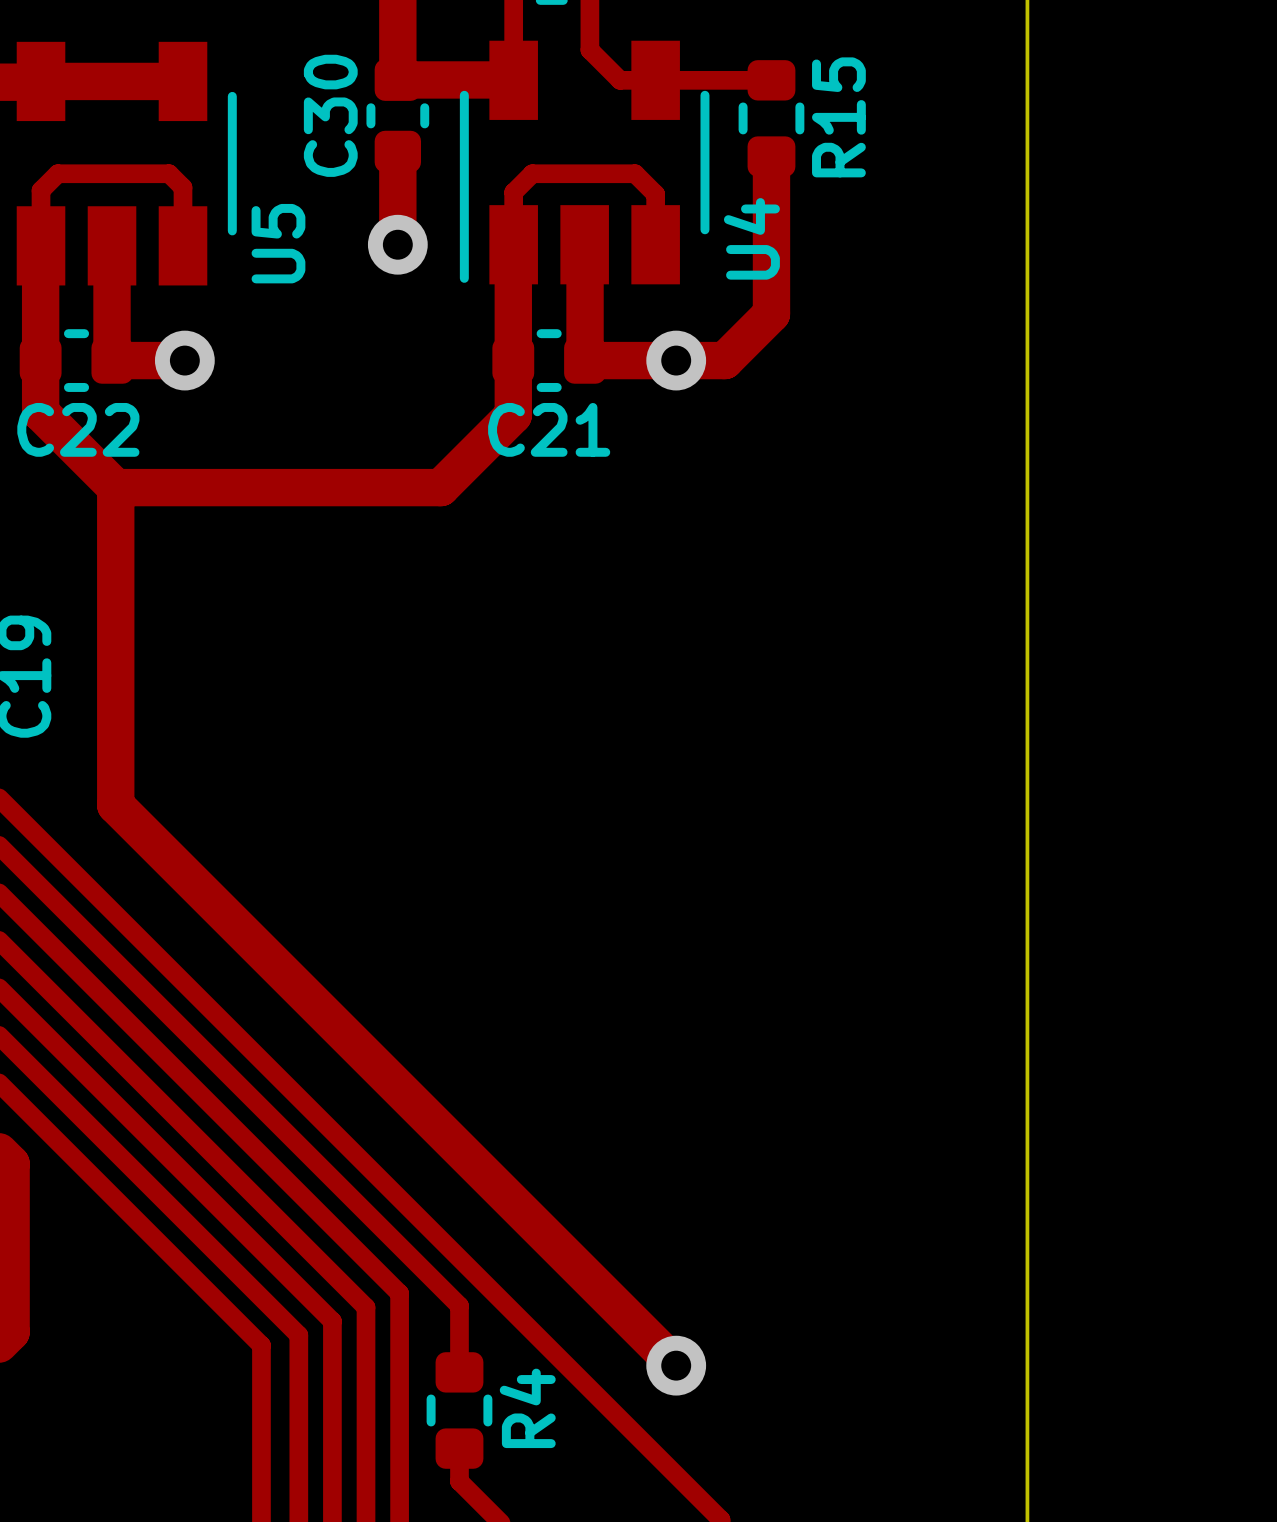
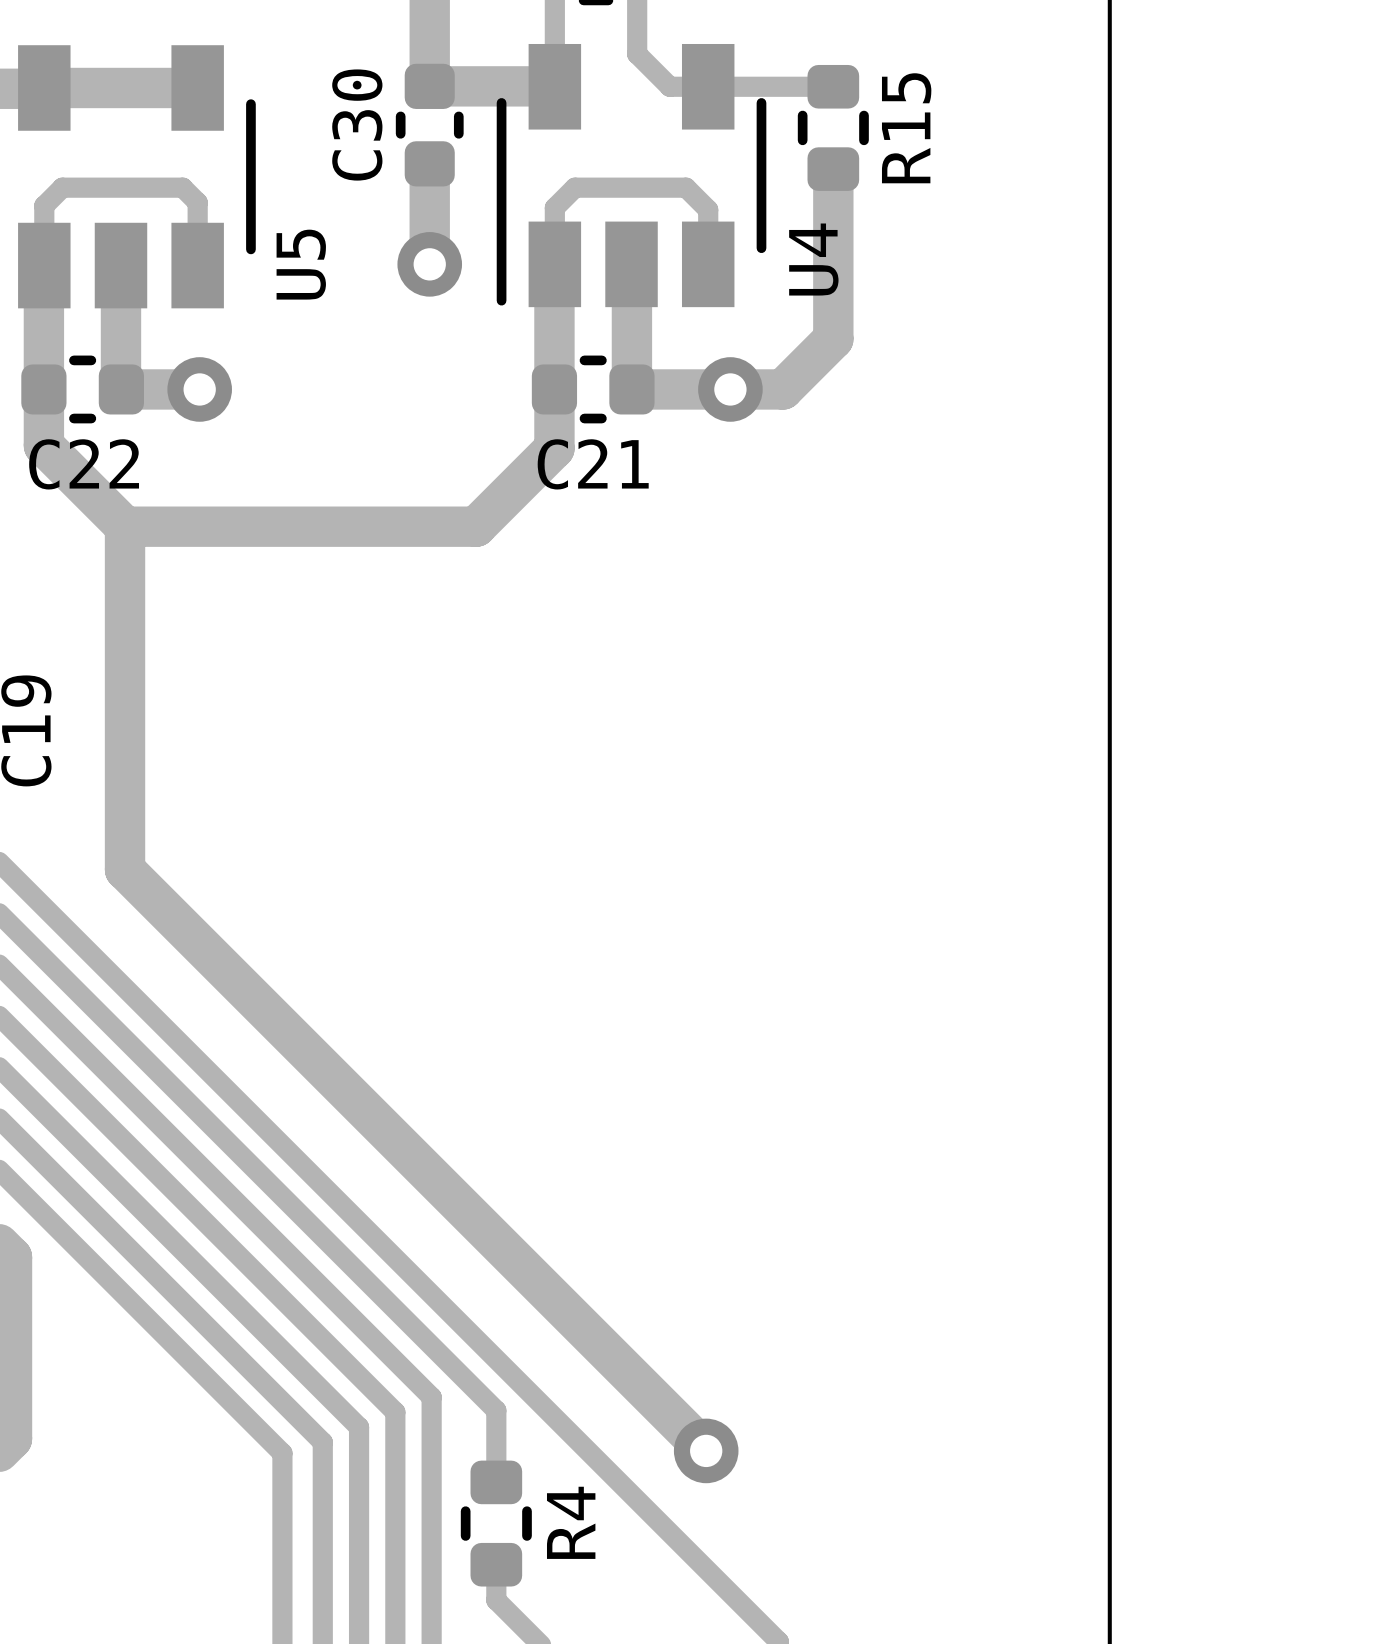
via position: (676, 1365) -> (706, 1450)

